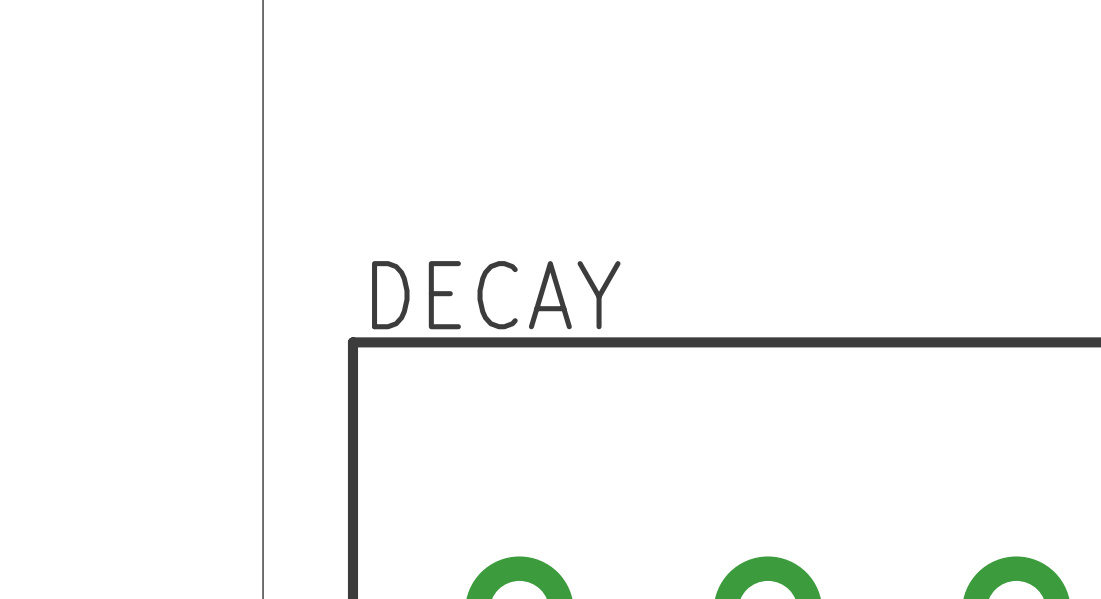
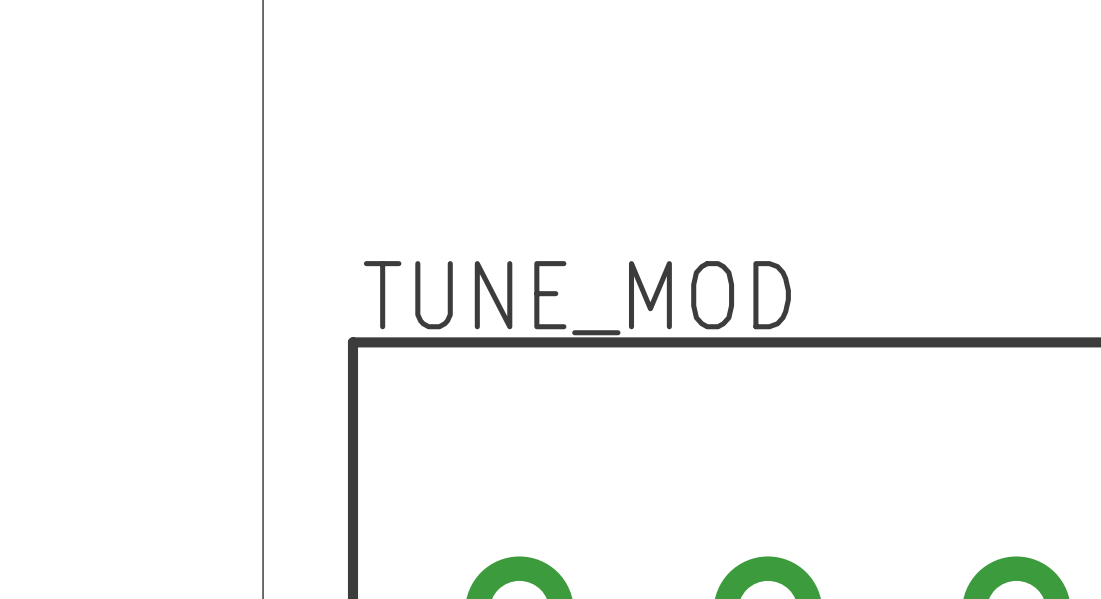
DECAY name: DECAY (496, 295) -> TUNE_MOD (577, 298)

